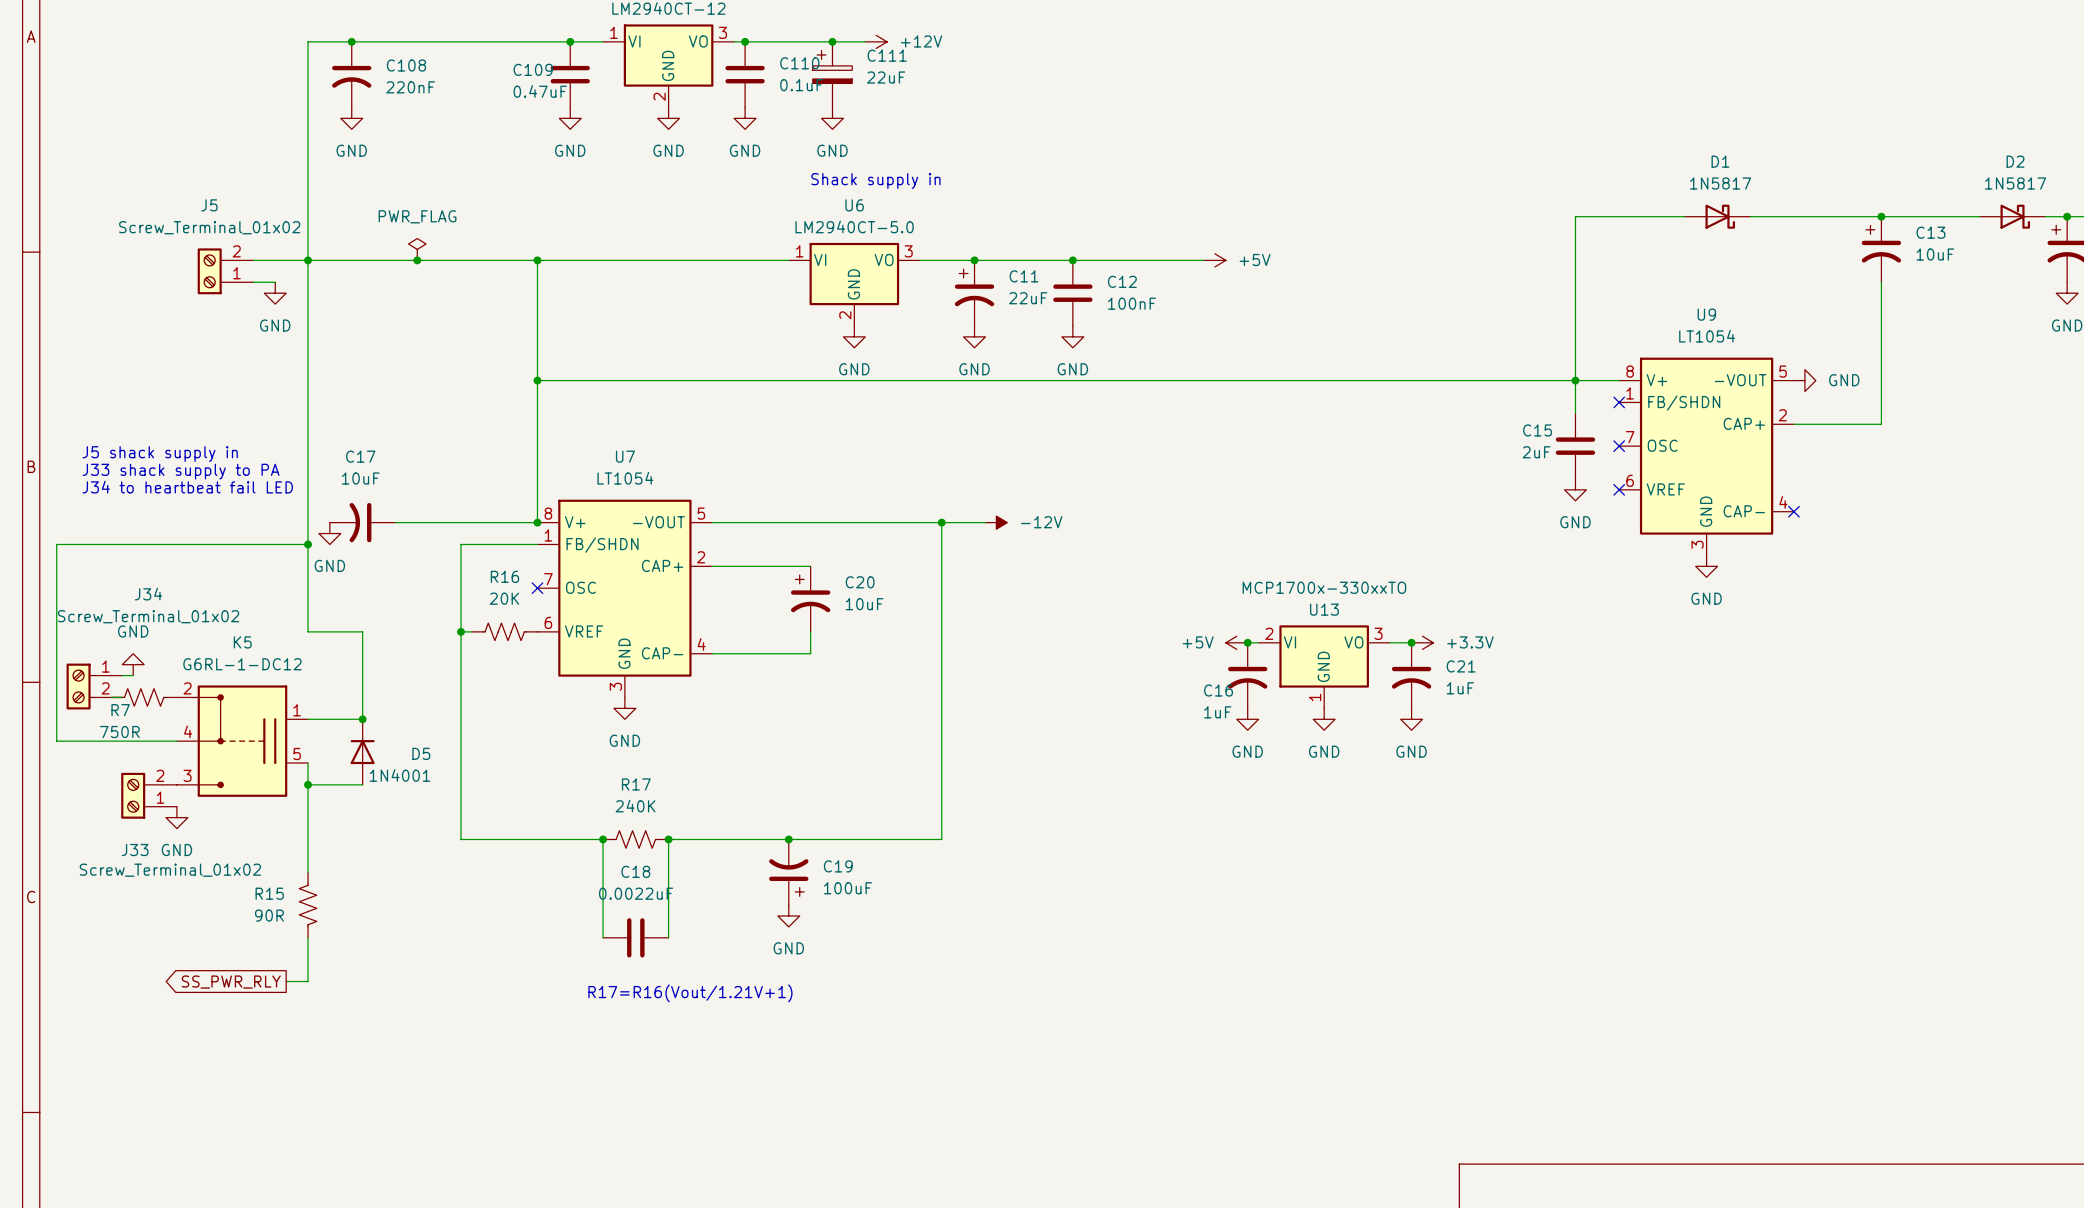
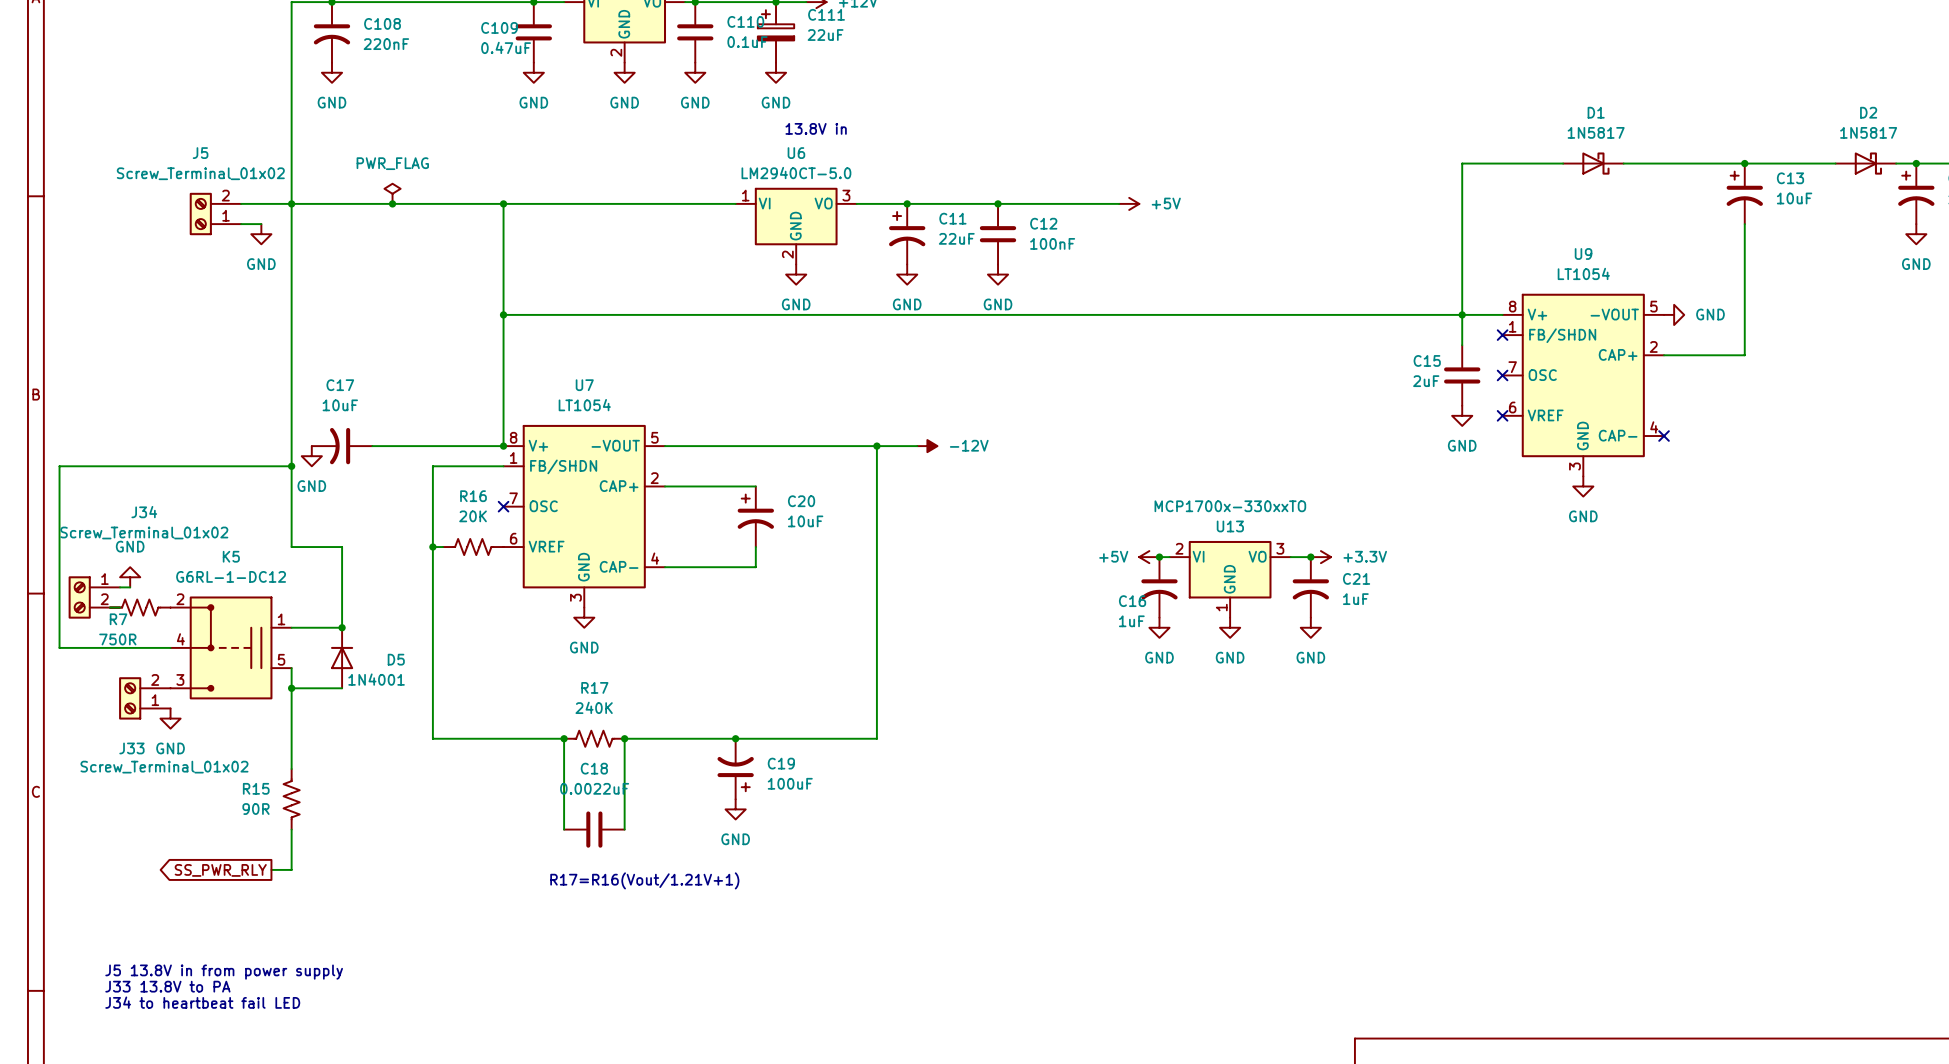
text: Shack supply in (875, 180) -> 13.8V in (816, 128)
text: J5 shack supply in (160, 454) -> none
text: J33 shack supply to PA (181, 471) -> none
text: J34 to heartbeat fail LED (187, 487) -> none
text: none -> J5 13.8V in from power supply (224, 972)
text: none -> J33 13.8V to PA (167, 986)
text: none -> J34 to heartbeat fail LED (202, 1002)

